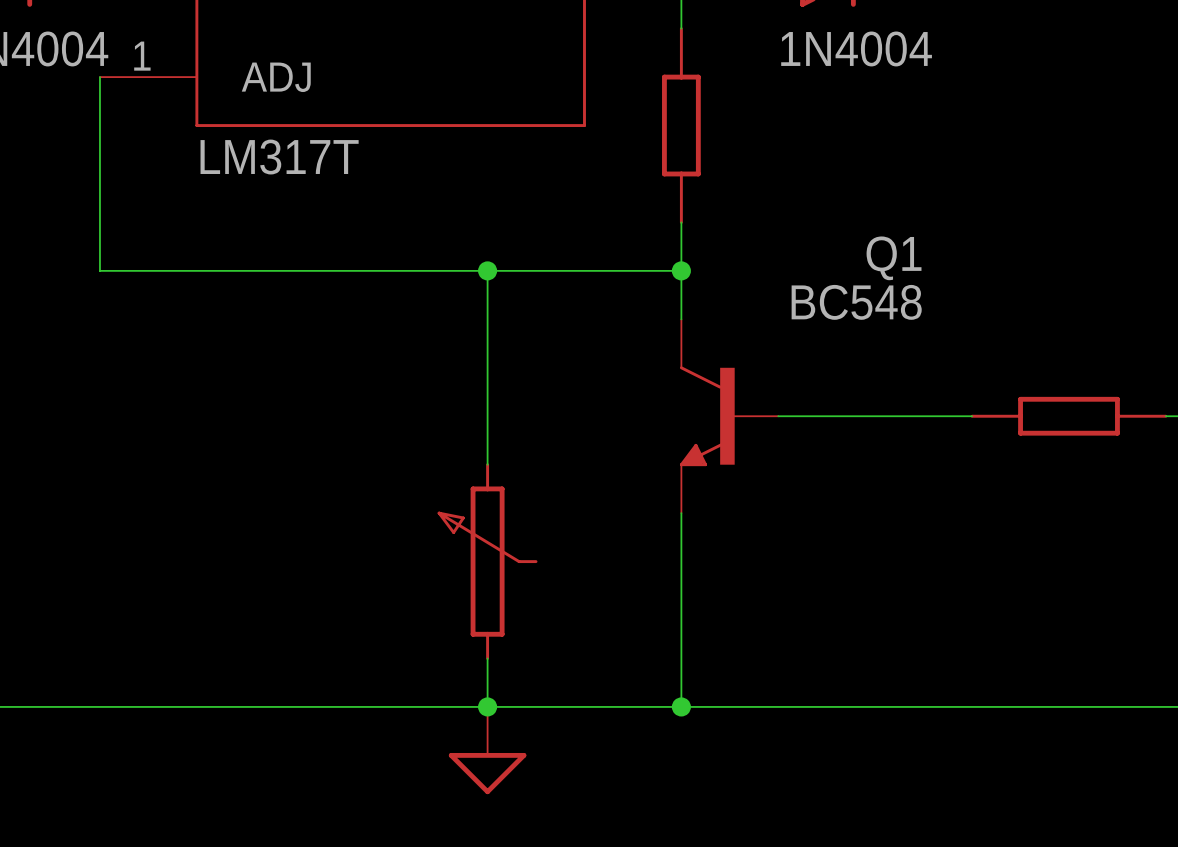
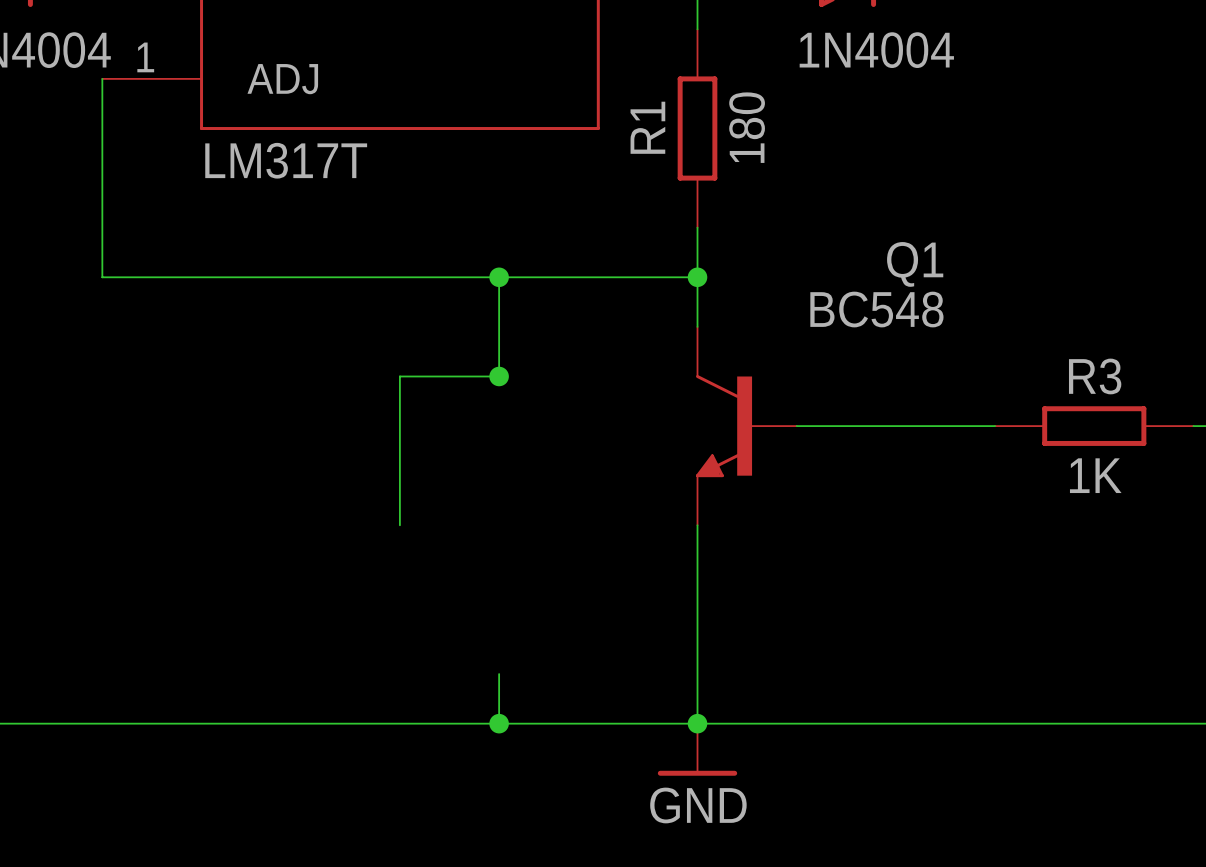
part: (681, 125) -> none
R1: none -> 180 (697, 128)
wire: (487, 367) (487, 464) -> (499, 376) (399, 376) (399, 525)
junction: none -> (499, 376)
part: (1069, 416) -> none
R3: none -> 1K (1094, 426)
part: (487, 561) -> none
power symbol: none -> GND (697, 749)
power symbol: (487, 750) -> none

